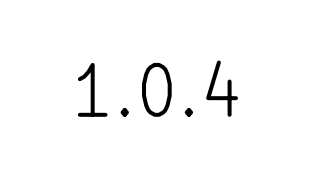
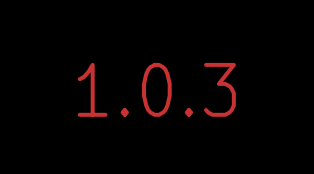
text: 1.0.4 (157, 88) -> 1.0.3 (156, 89)

